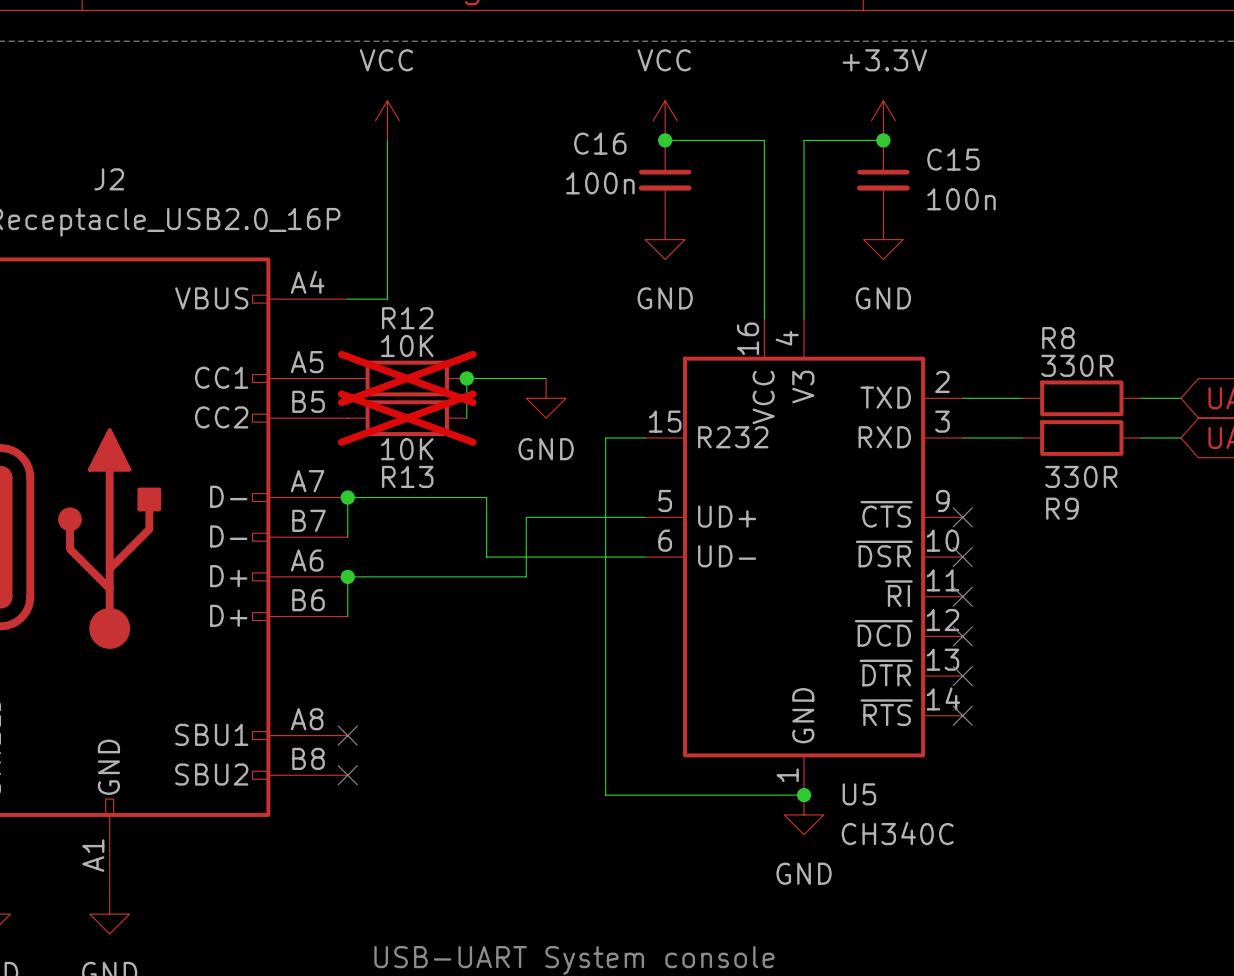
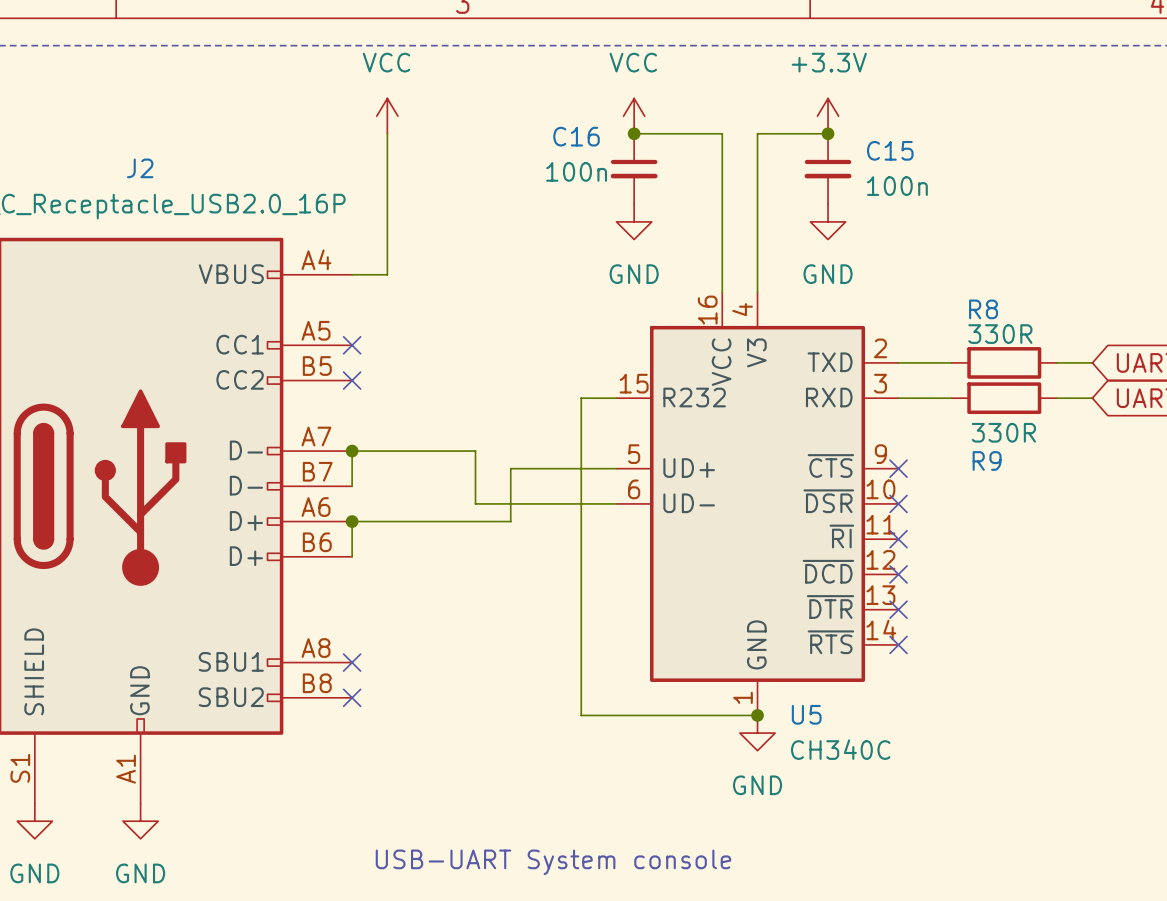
no-connect mark: none -> (352, 345)
R12: 10K (407, 378) -> none
junction: (466, 378) -> none
wire: (546, 378) (466, 378) (466, 418) -> none
power symbol: GND (546, 398) -> none
no-connect mark: none -> (352, 380)
R13: 10K (407, 418) -> none

